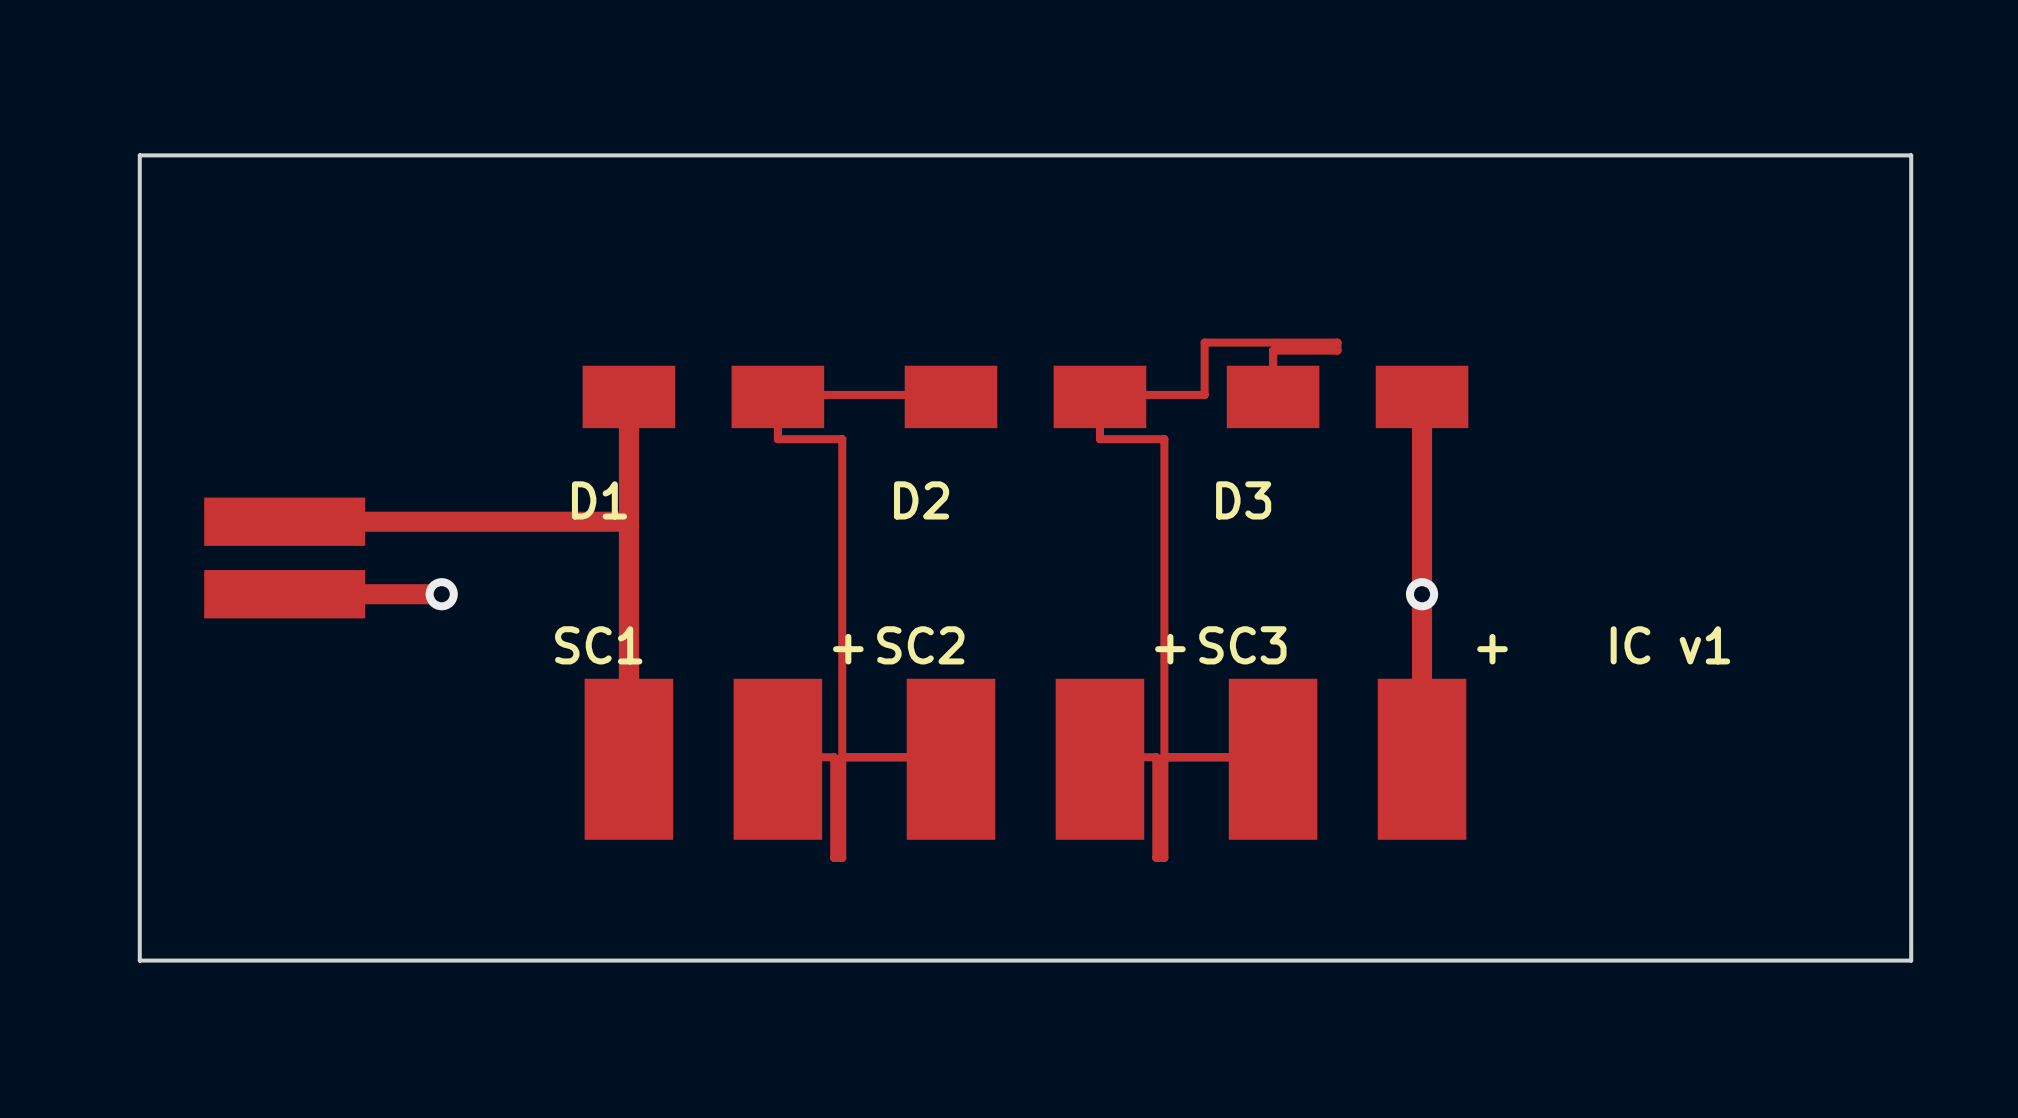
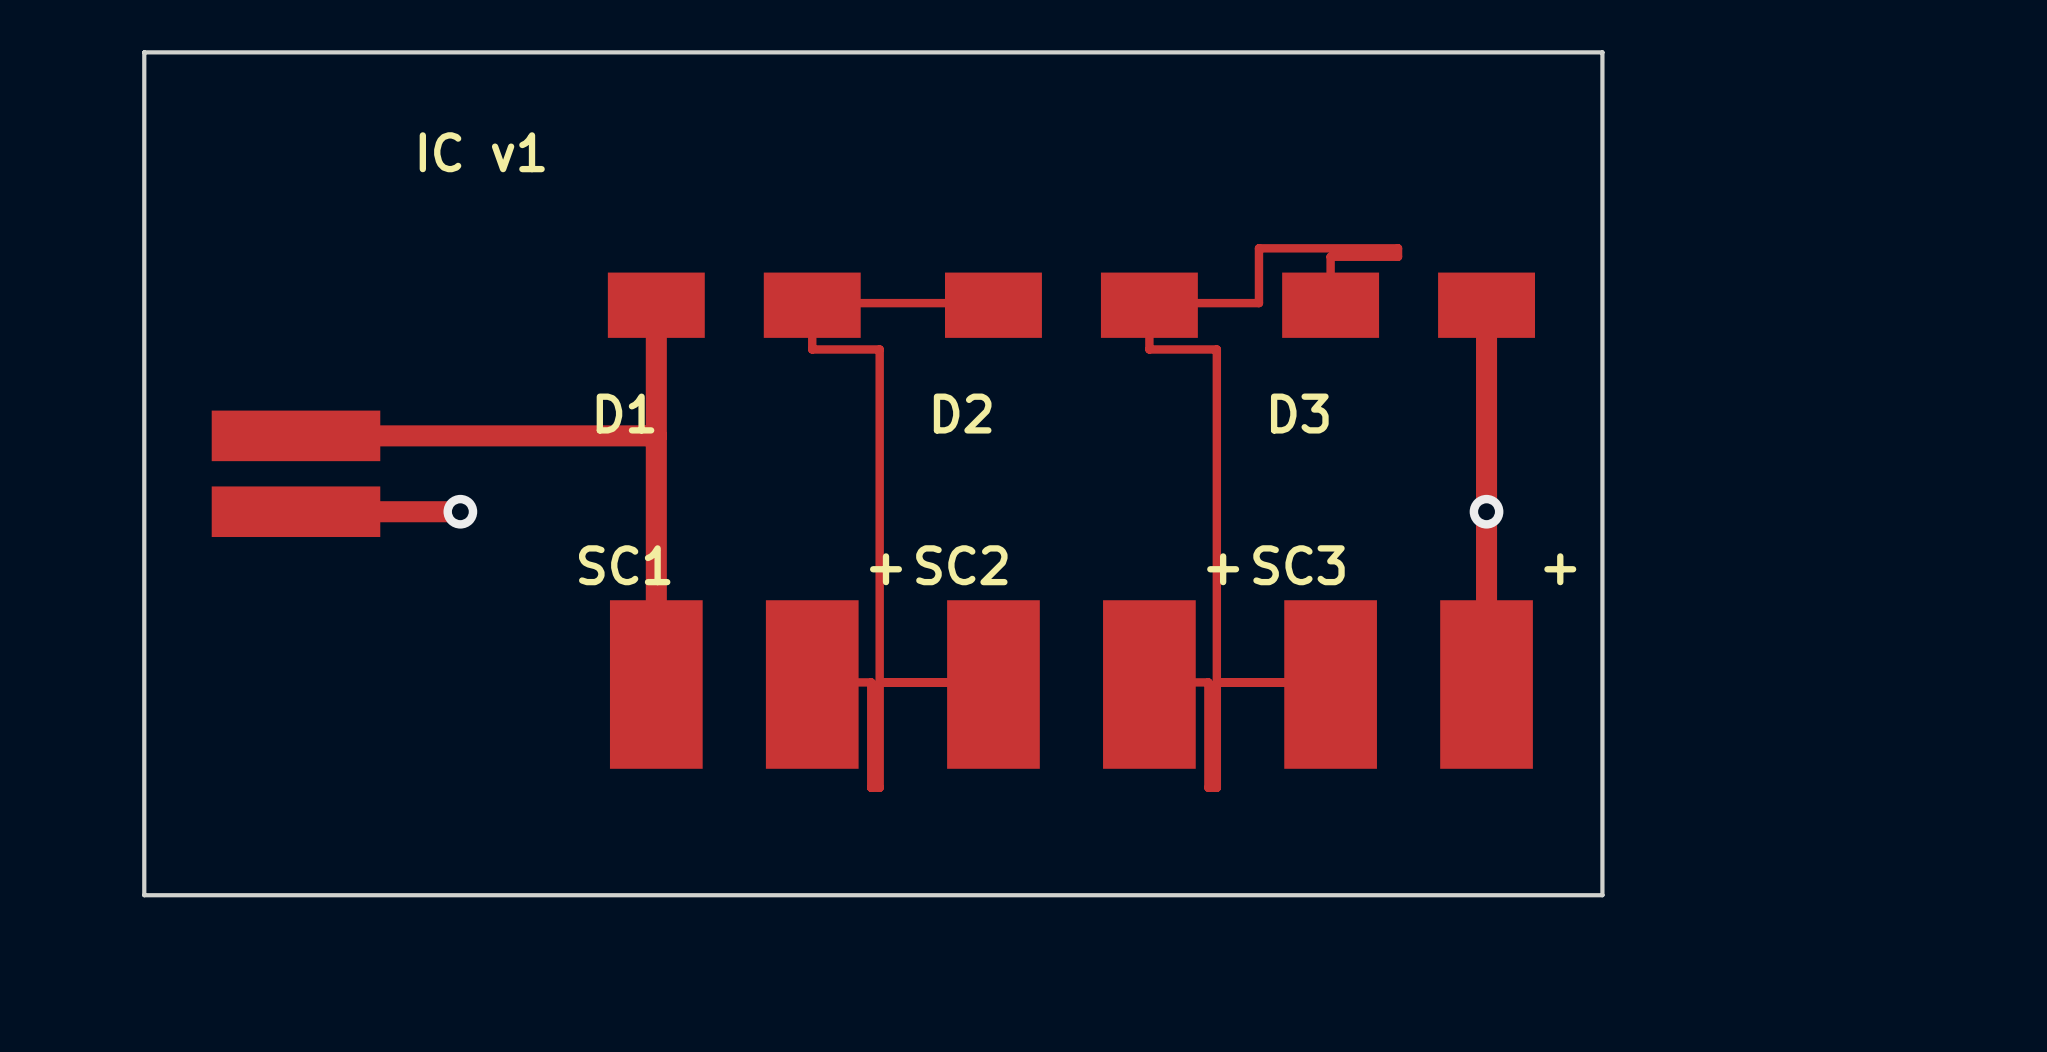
board edge: (1532, 155) (1911, 155) (1911, 960) (1532, 960) -> (1602, 52) (1602, 895)
text: none -> IC v1 (482, 152)
text: IC v1 (1670, 645) -> none

